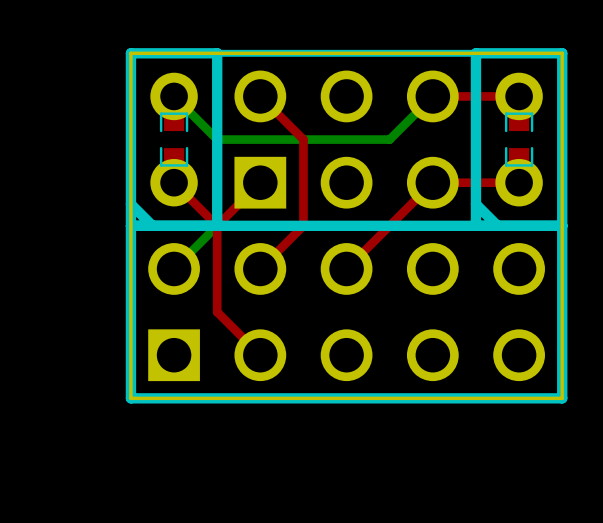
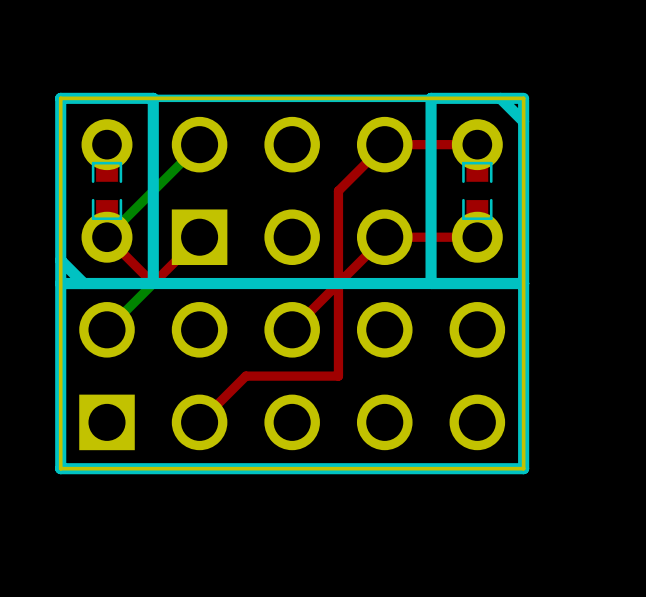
bottom track: (174, 96) (217, 139) (389, 139) (432, 96) -> none
top track: (260, 96) (303, 139) (303, 225) (260, 268) -> none
bottom track: none -> (199, 144) (107, 237)
part rotation: 0° (519, 139) -> 180° (477, 190)
top track: (217, 225) (217, 312) (260, 355) -> (384, 144) (338, 190) (338, 376) (245, 376) (199, 422)

